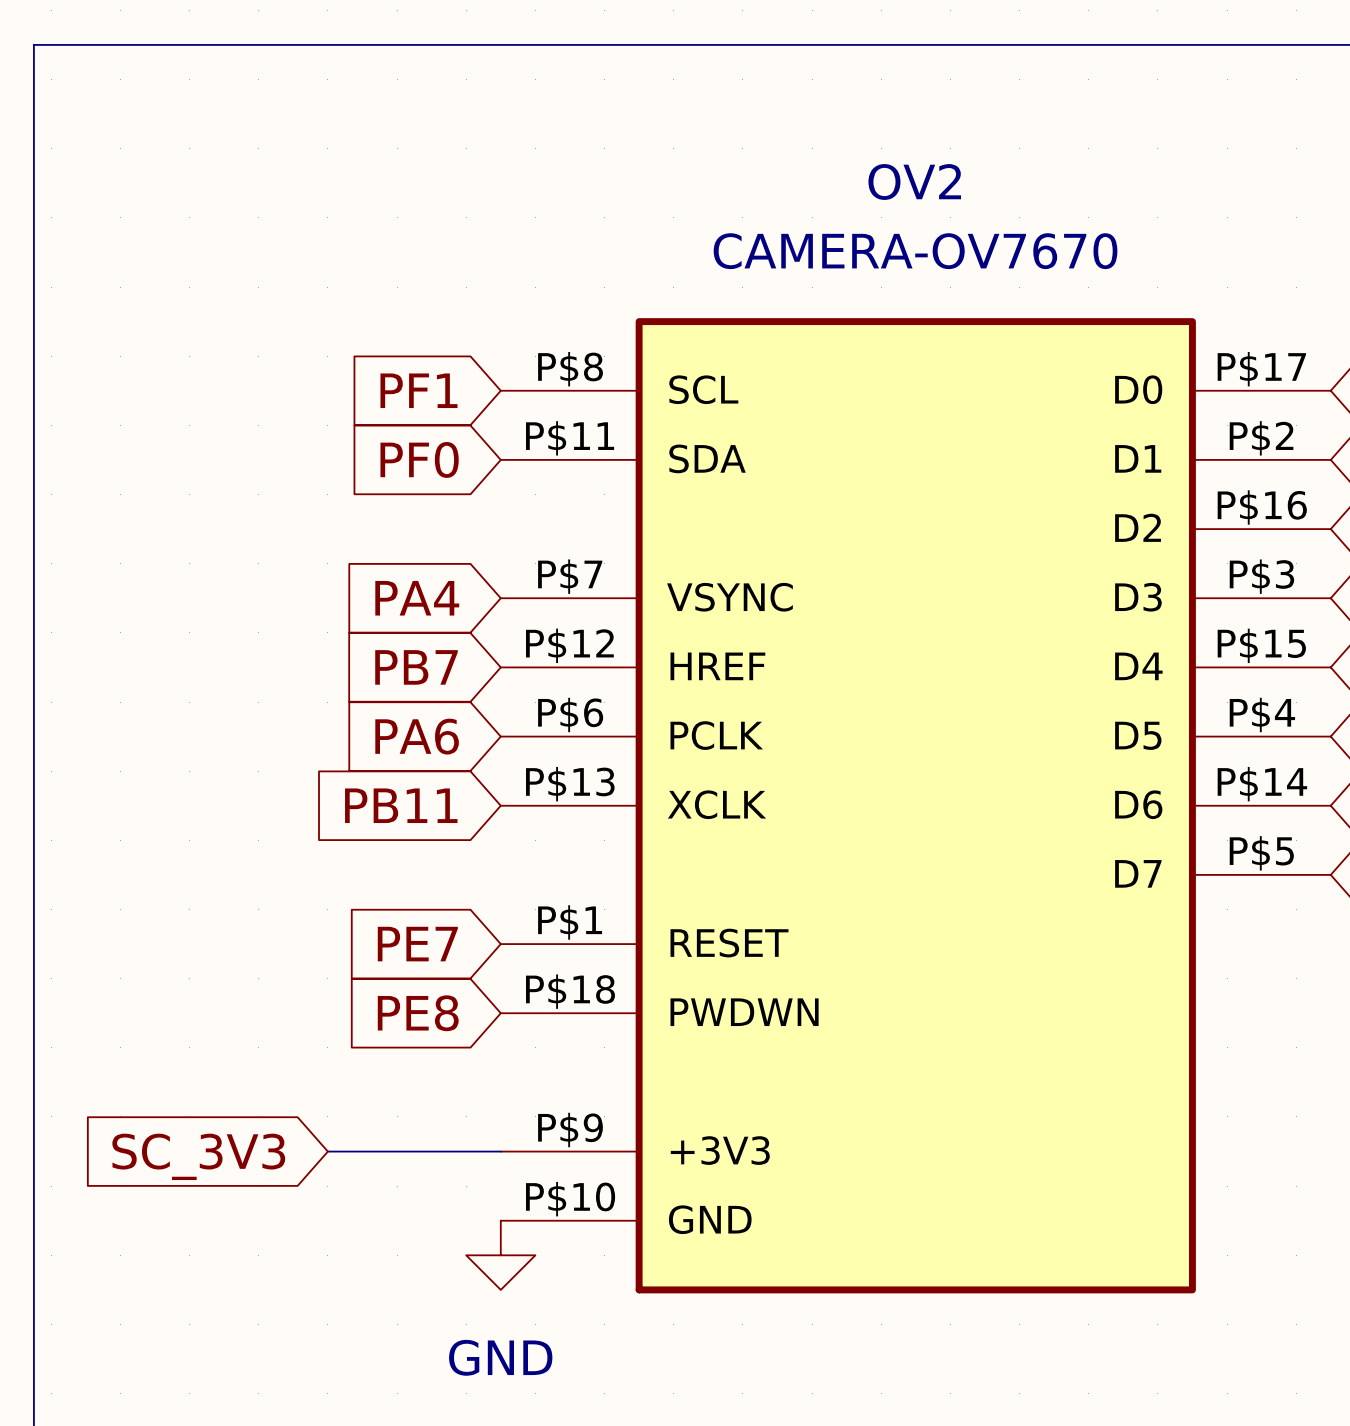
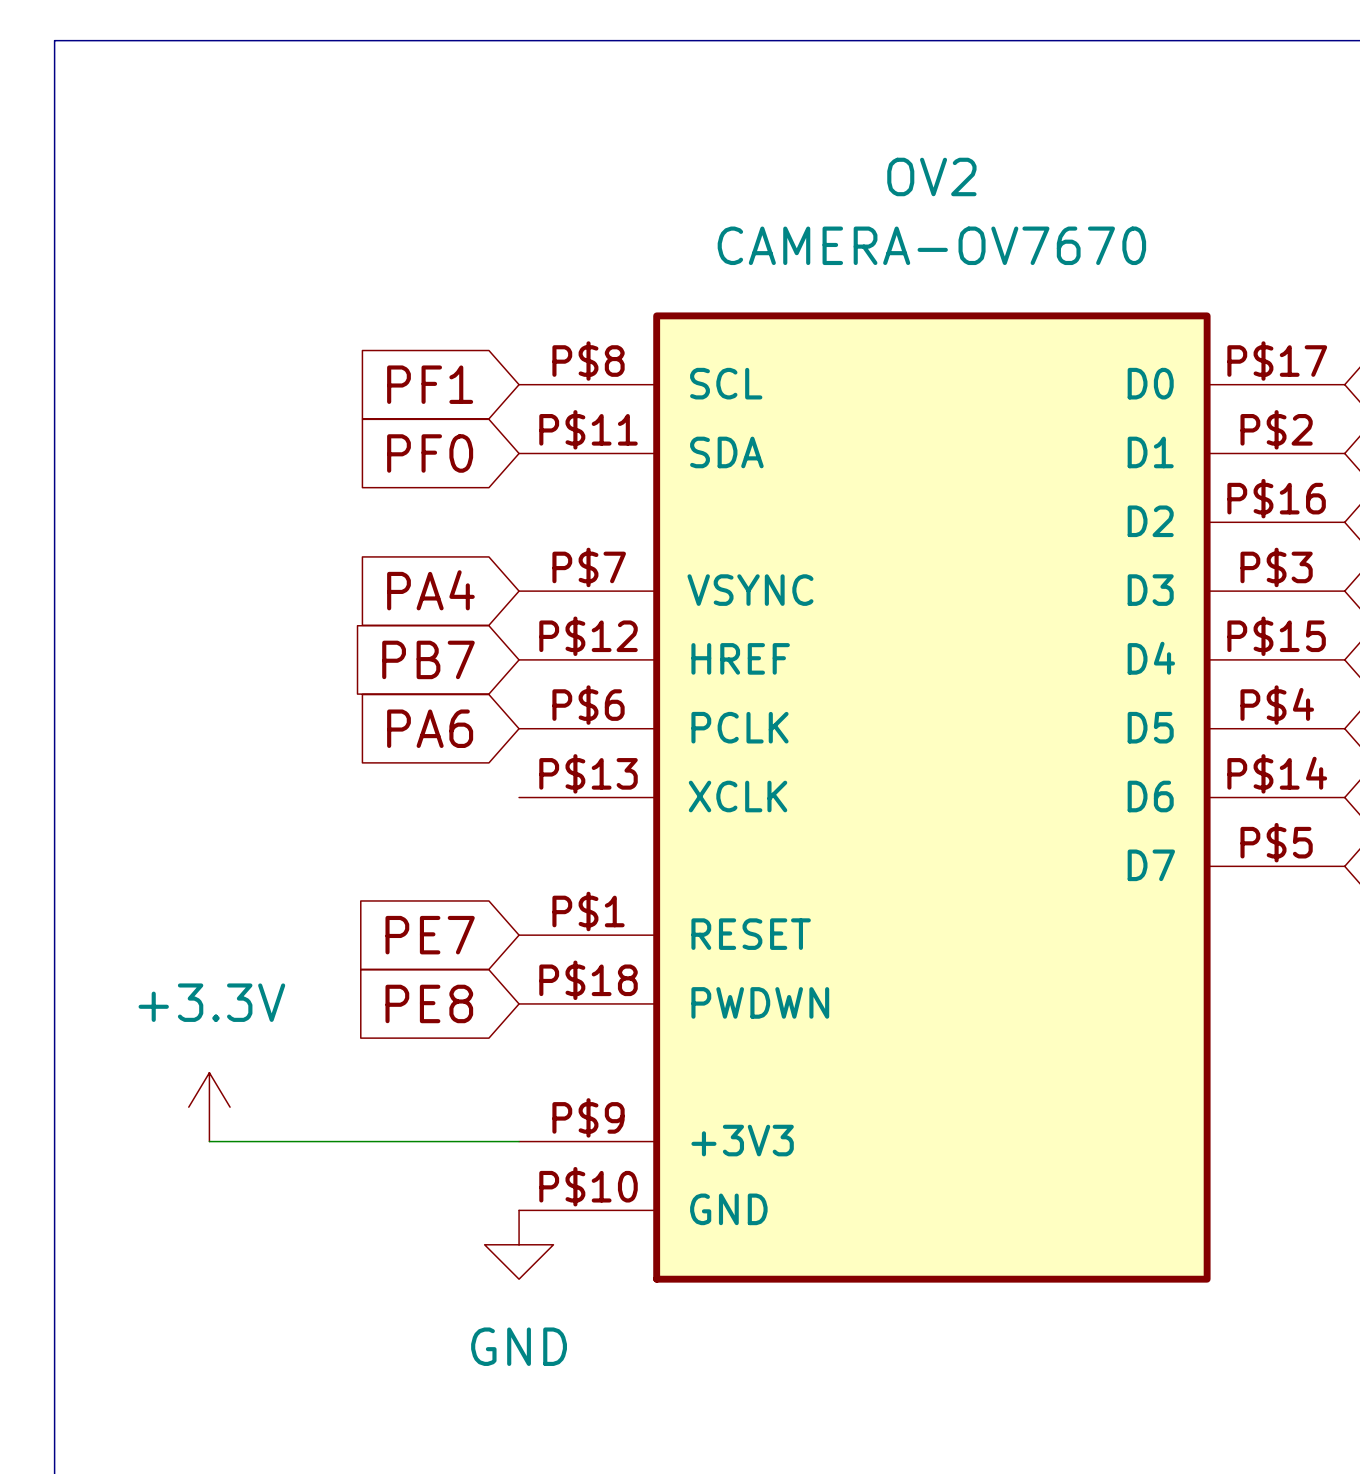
global label: PB11 (401, 805) -> none
power symbol: none -> +3.3V (209, 1107)
wire: none -> (209, 1141) (347, 1141)
global label: SC_3V3 (198, 1156) -> none

